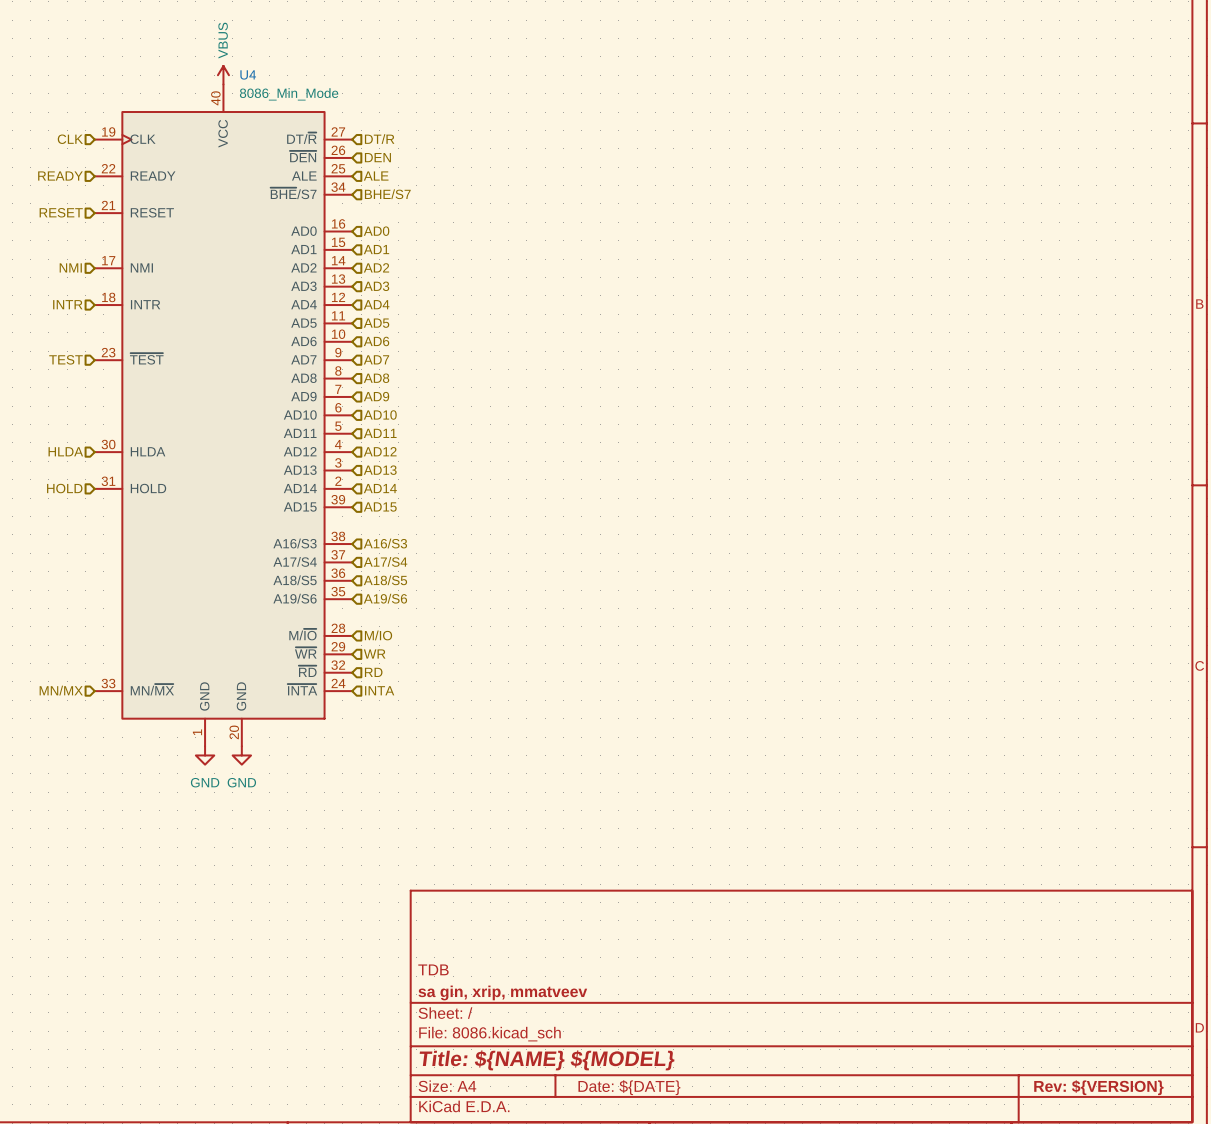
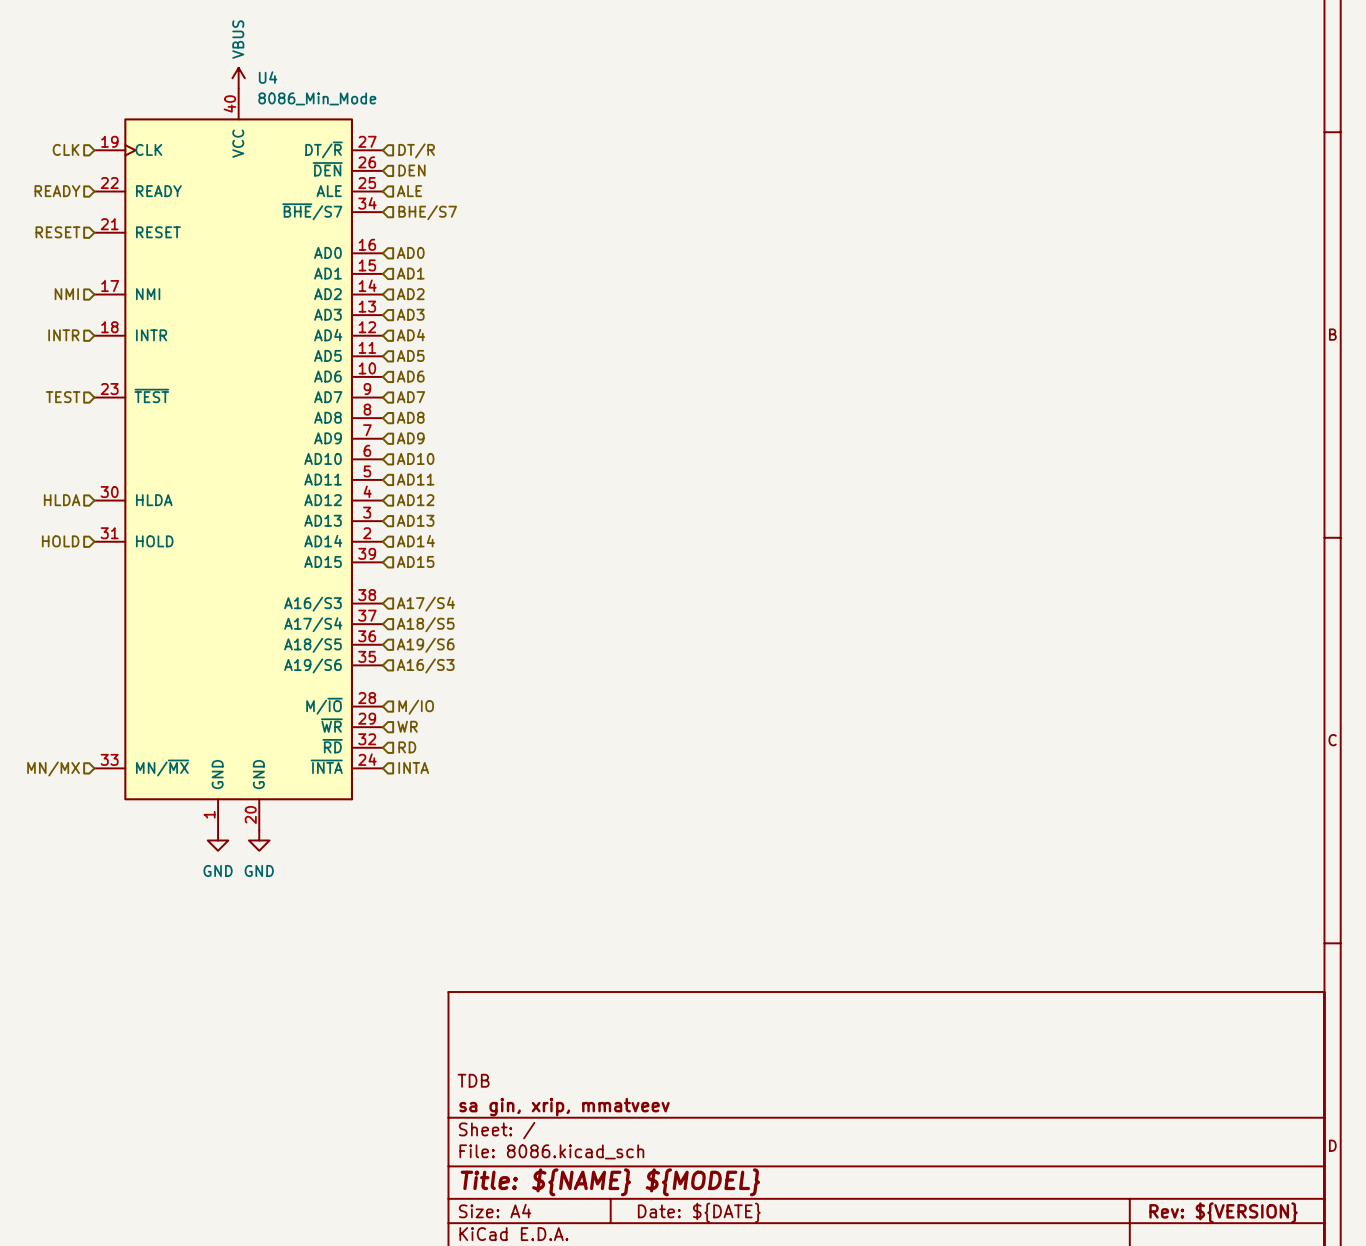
hierarchical label: A16/S3 (385, 543) -> A17/S4 (425, 604)
hierarchical label: A17/S4 (385, 561) -> A18/S5 (425, 624)
hierarchical label: A18/S5 (385, 580) -> A19/S6 (425, 645)
hierarchical label: A19/S6 (385, 598) -> A16/S3 (425, 665)

